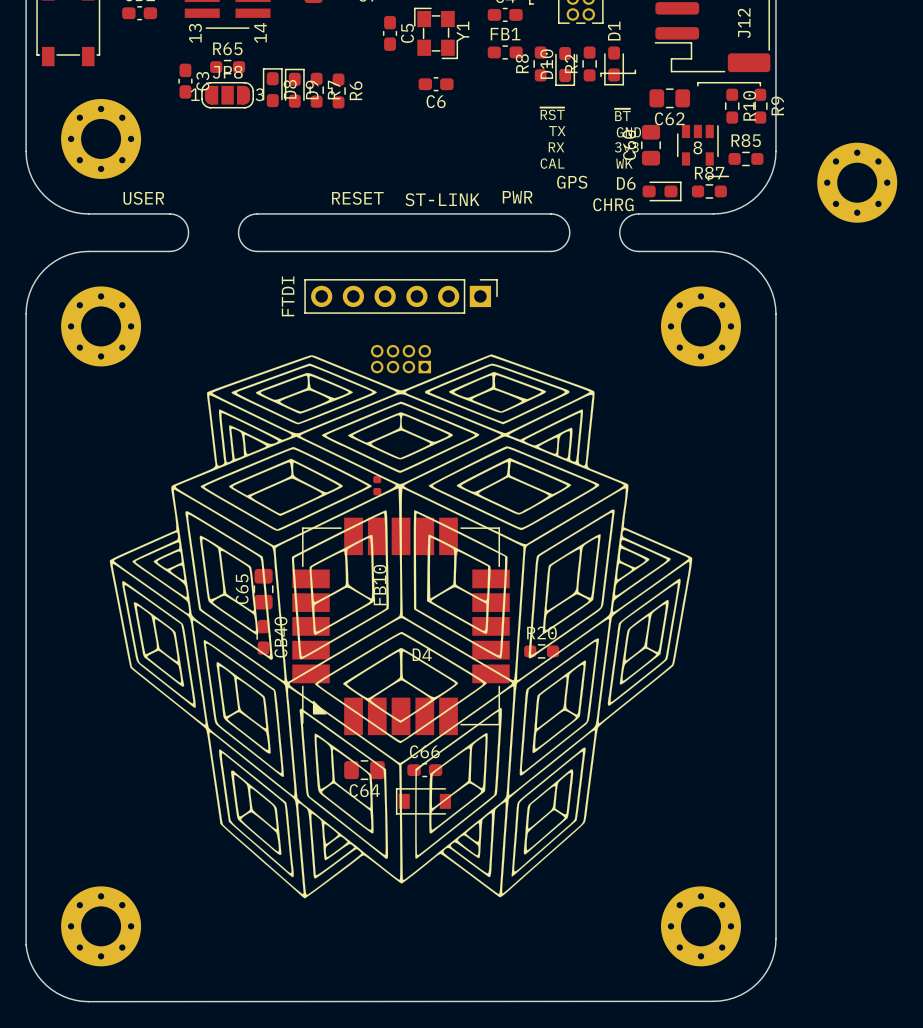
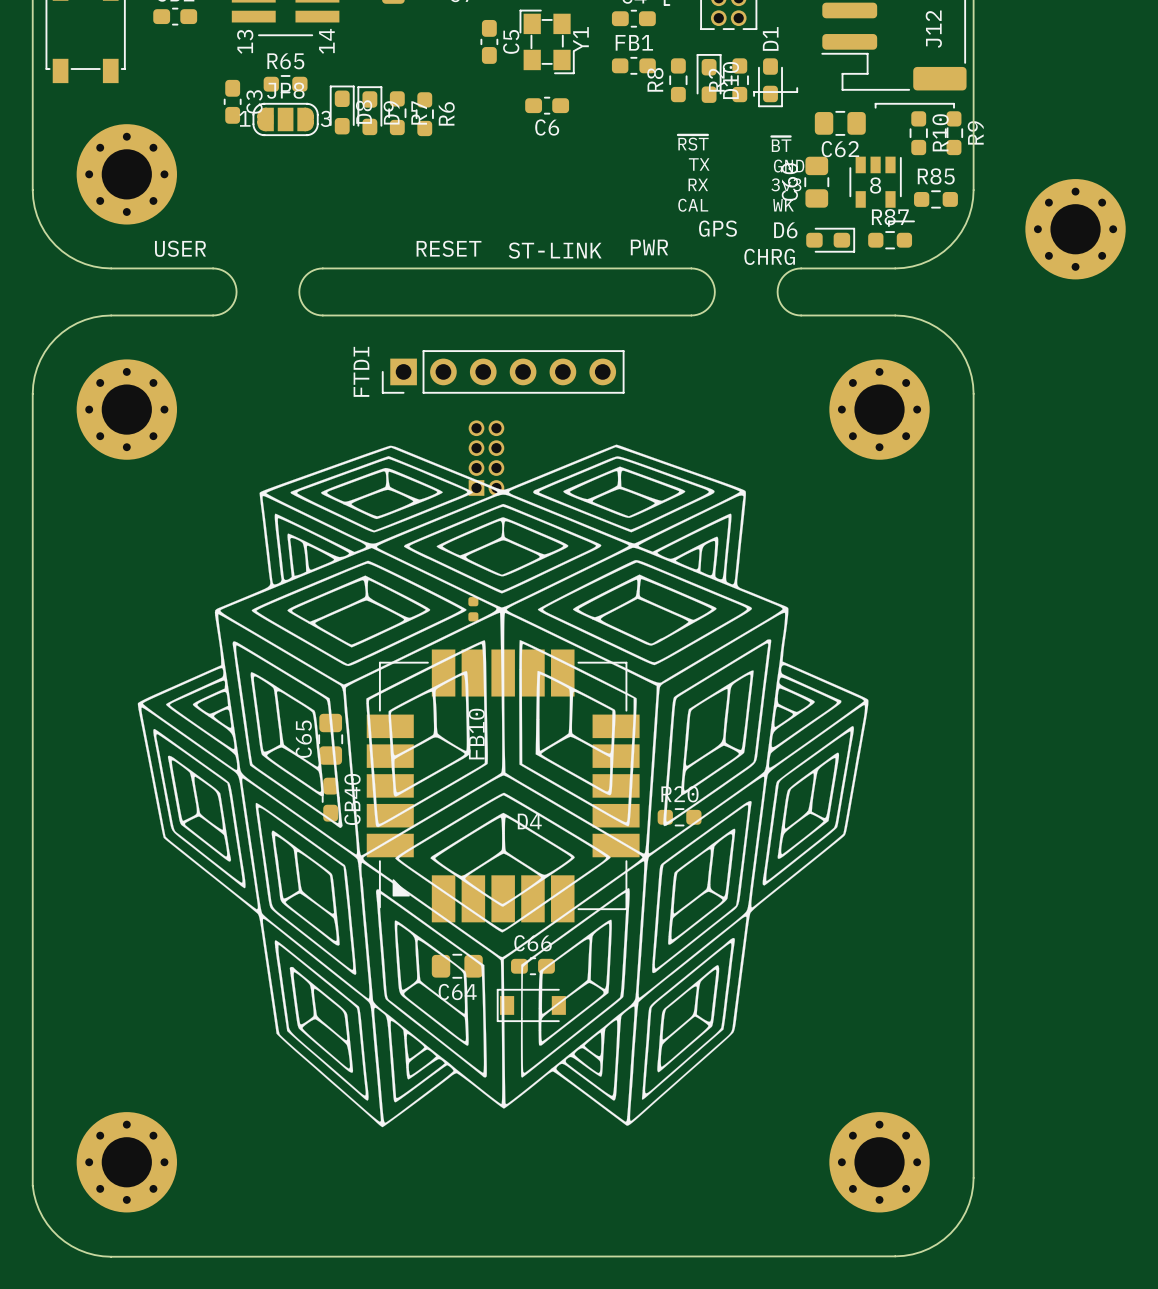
D10 rotation: 0° (565, 66) -> 180° (709, 78)
part rotation: 0° (401, 296) -> 180° (503, 371)
part rotation: 0° (400, 359) -> 90° clockwise (486, 458)

